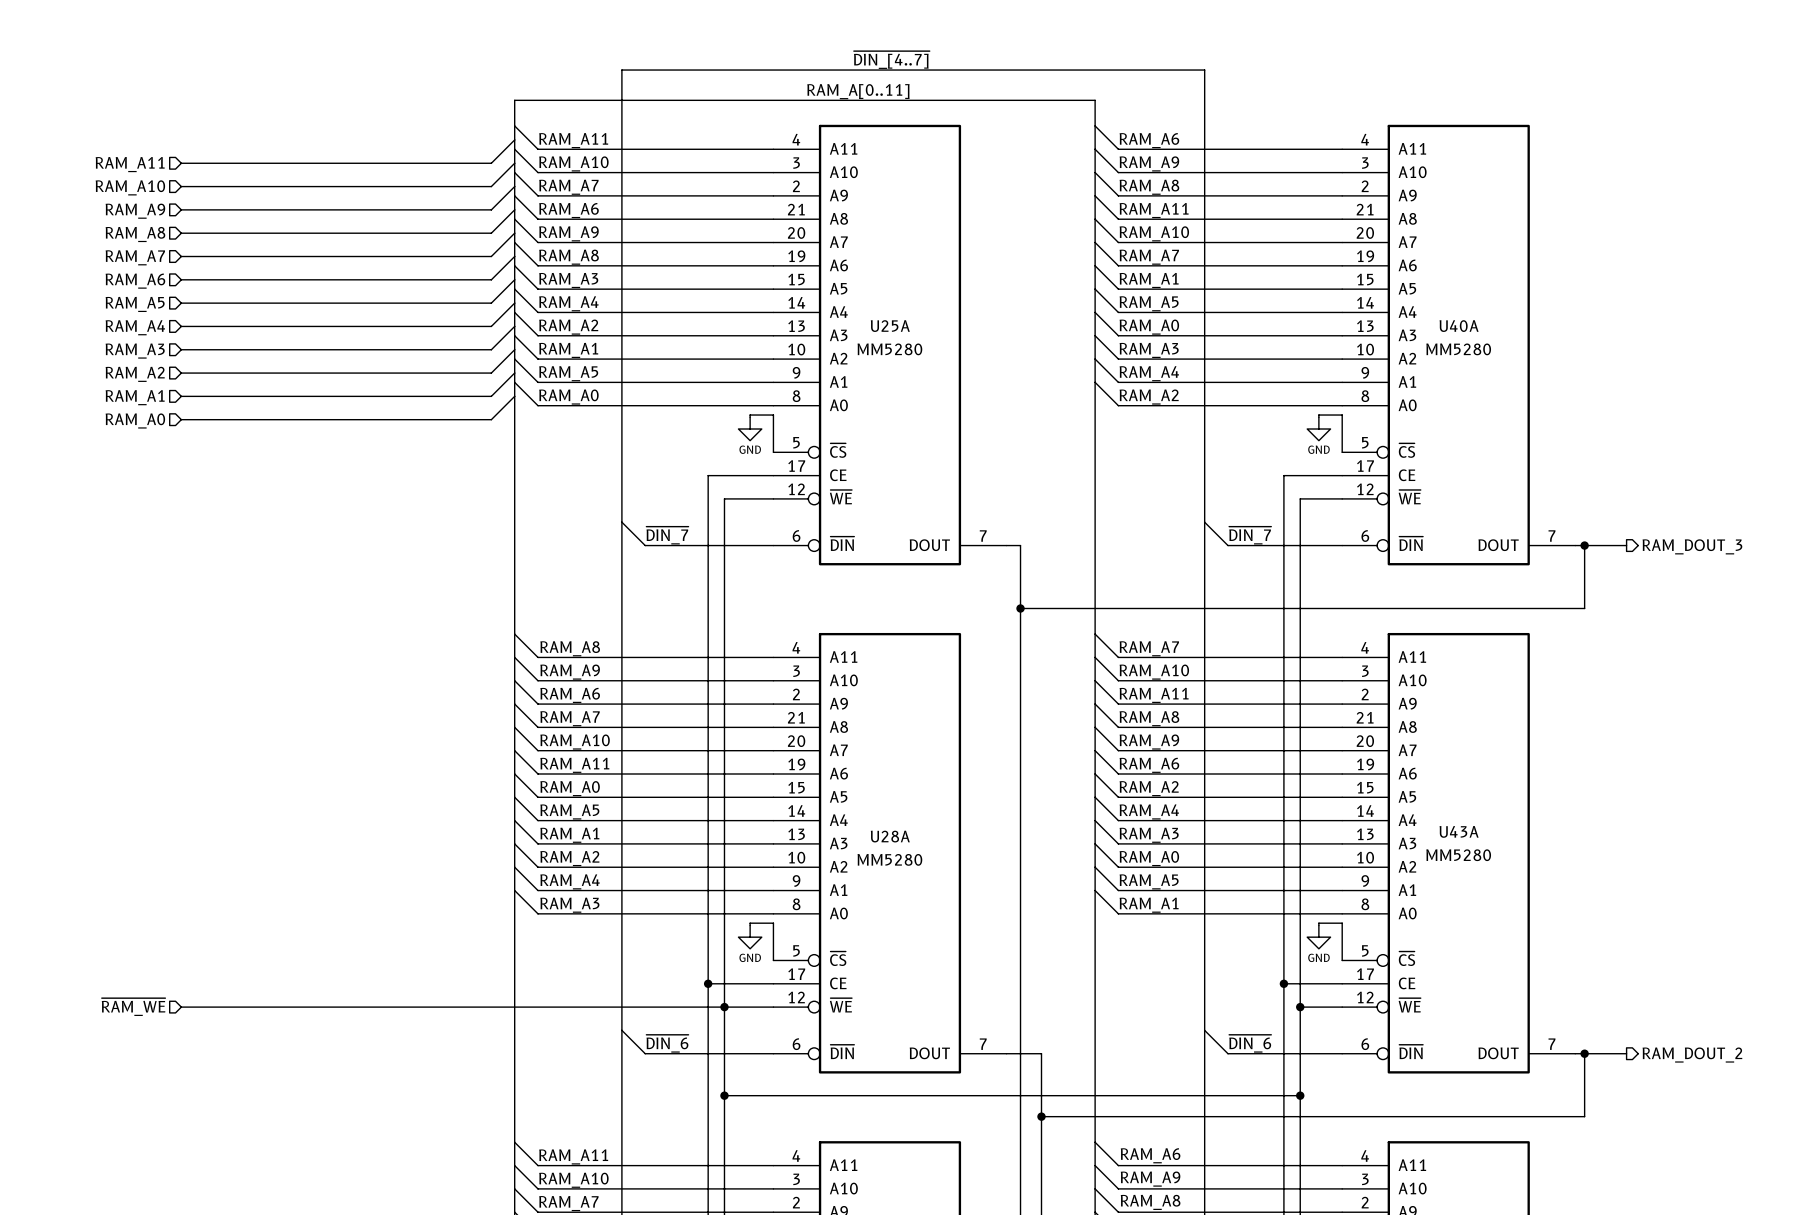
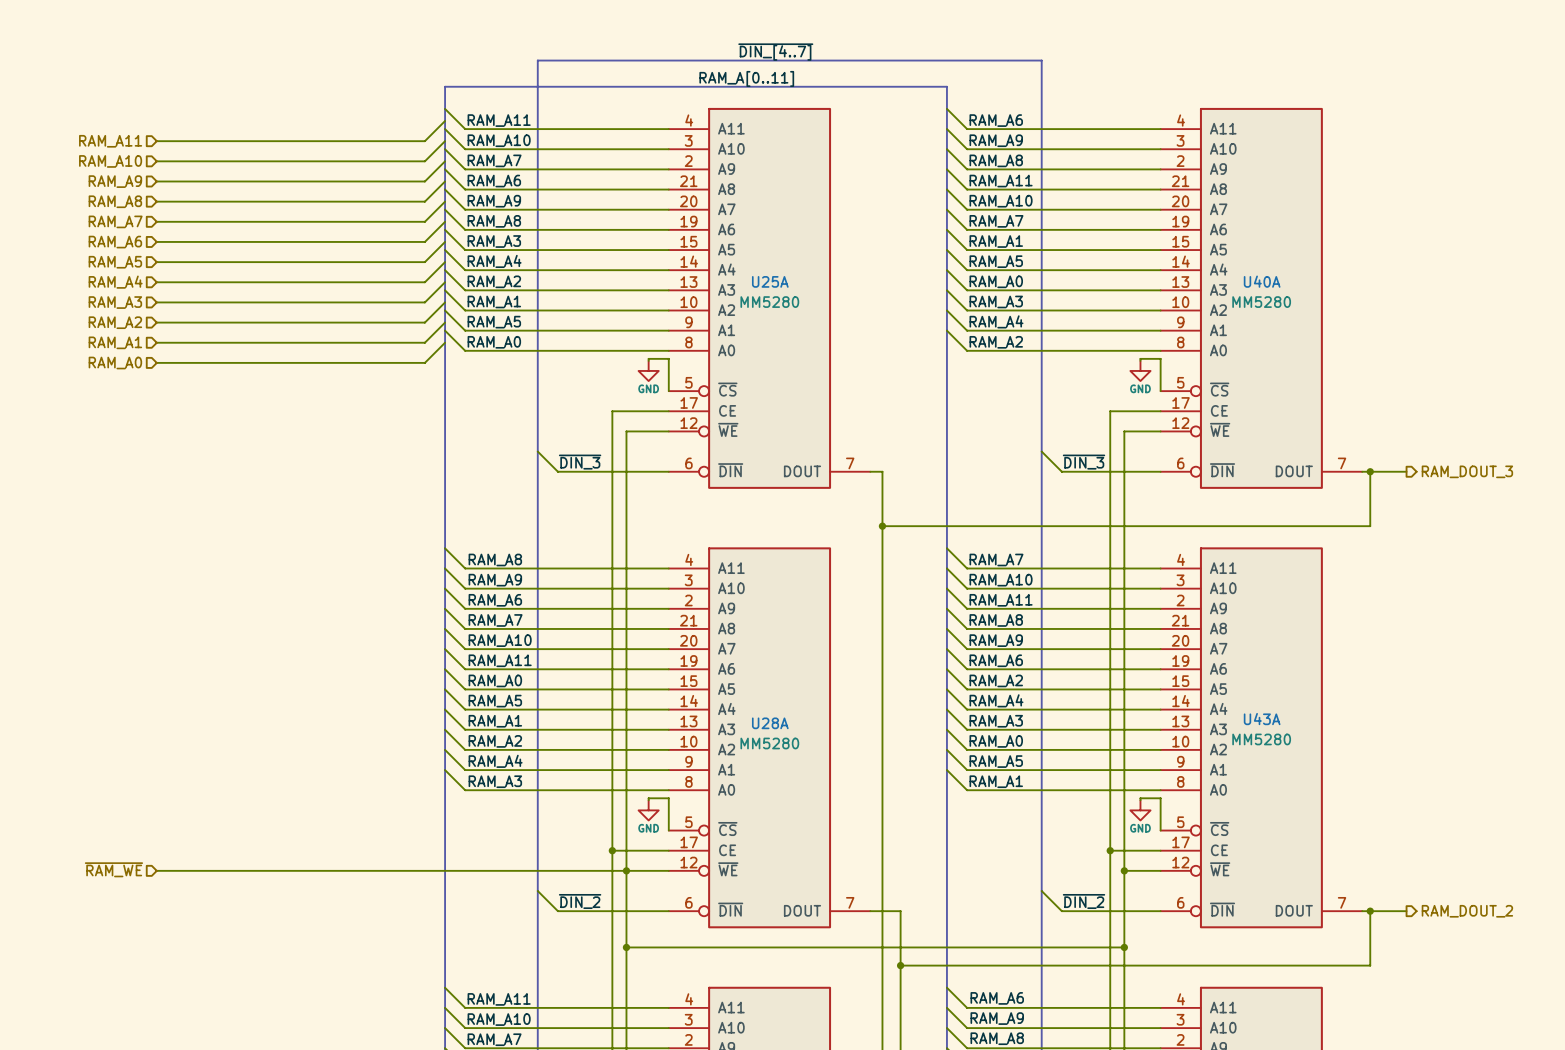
label: ~{DIN_7} (667, 535) -> ~{DIN_3} (580, 462)
label: ~{DIN_7} (1250, 535) -> ~{DIN_3} (1084, 462)
label: ~{DIN_6} (667, 1043) -> ~{DIN_2} (580, 901)
label: ~{DIN_6} (1250, 1043) -> ~{DIN_2} (1084, 901)

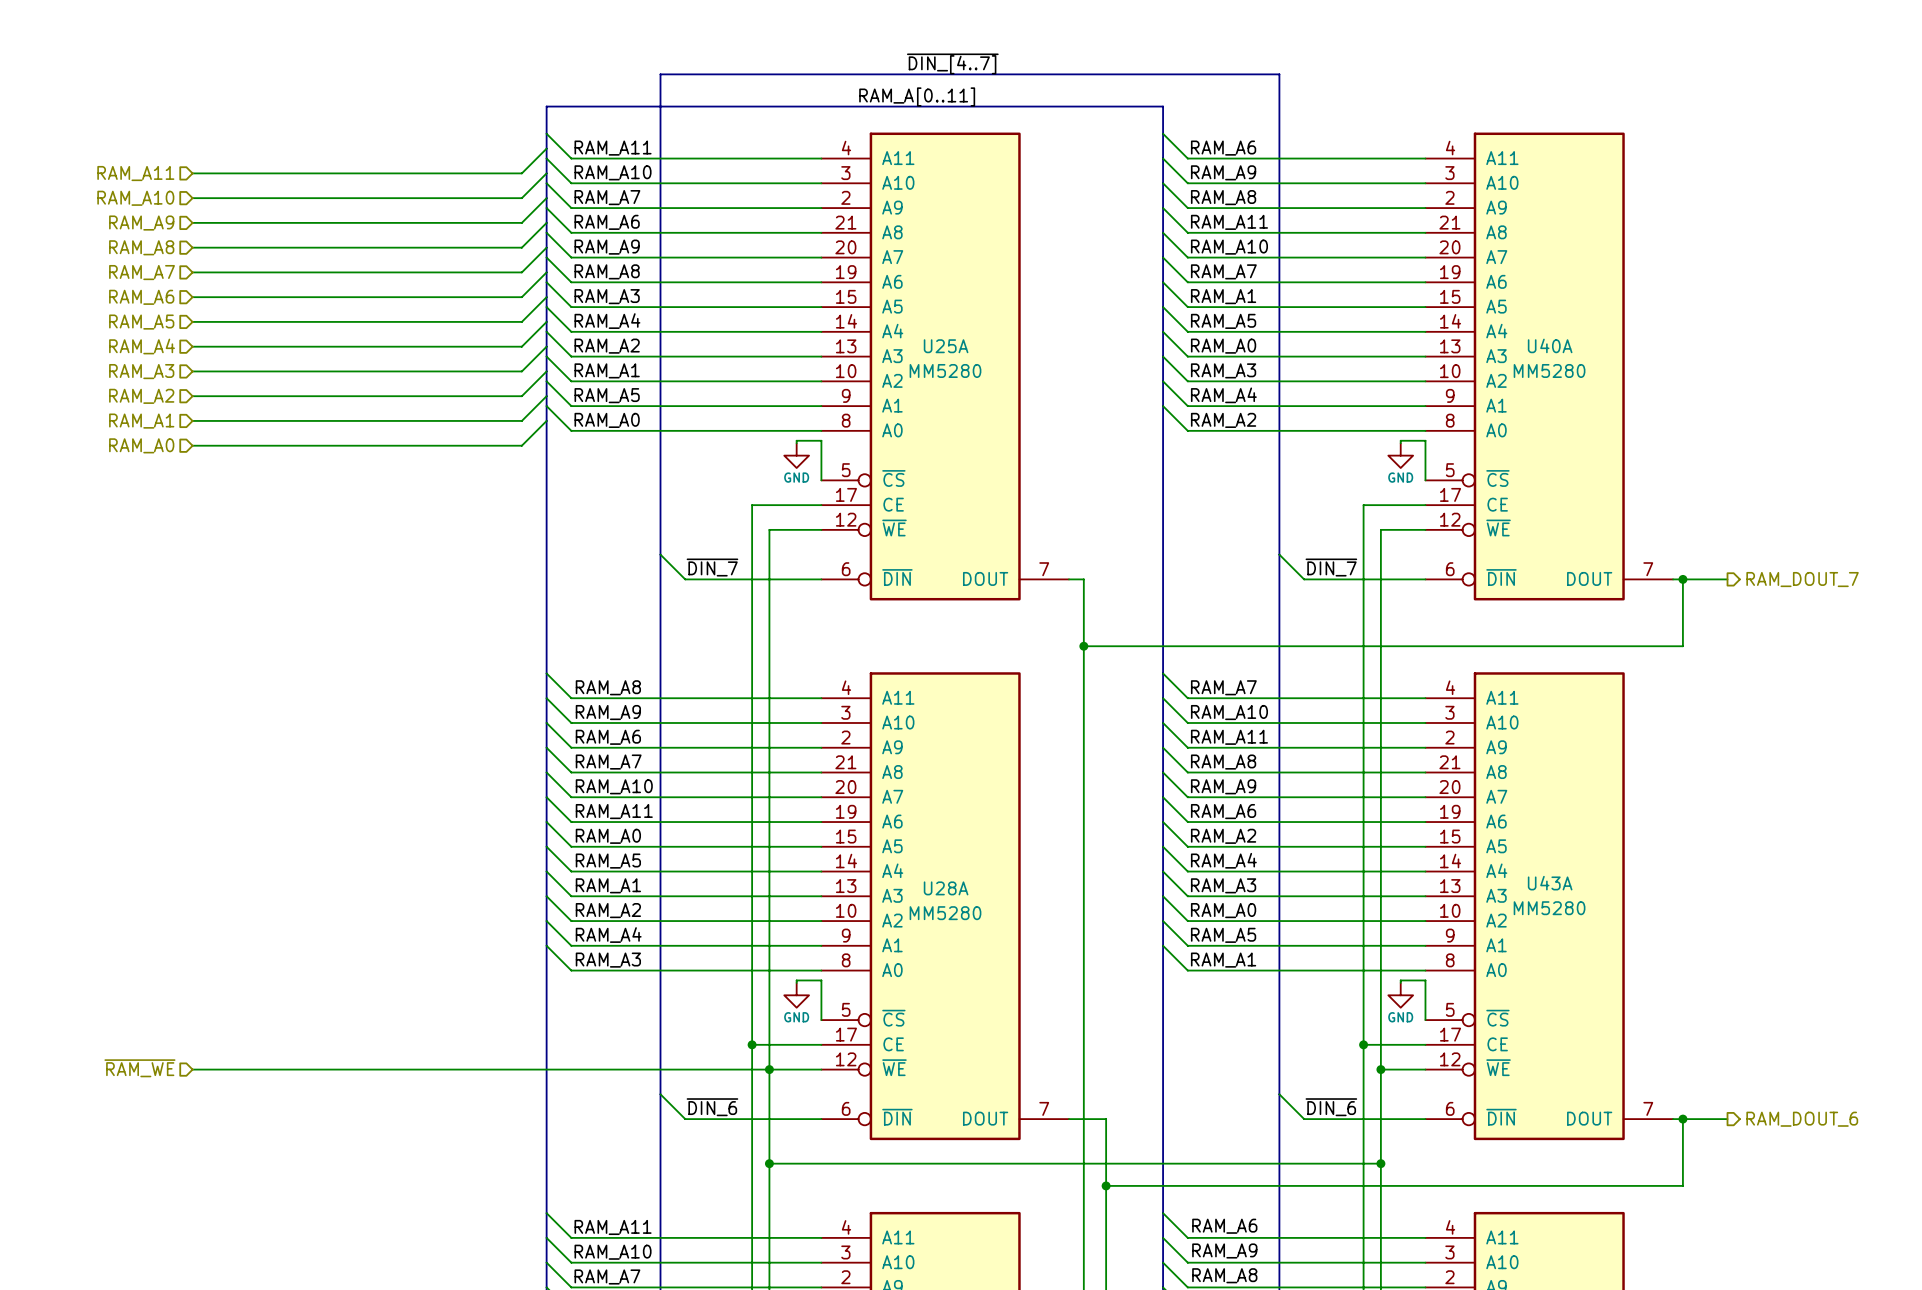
label: ~{DIN_3} (580, 462) -> ~{DIN_7} (712, 567)
label: ~{DIN_3} (1084, 462) -> ~{DIN_7} (1331, 567)
hierarchical label: RAM_DOUT_3 (1467, 471) -> RAM_DOUT_7 (1802, 579)
label: ~{DIN_2} (580, 901) -> ~{DIN_6} (712, 1107)
label: ~{DIN_2} (1084, 901) -> ~{DIN_6} (1331, 1107)
hierarchical label: RAM_DOUT_2 (1467, 911) -> RAM_DOUT_6 (1802, 1119)

